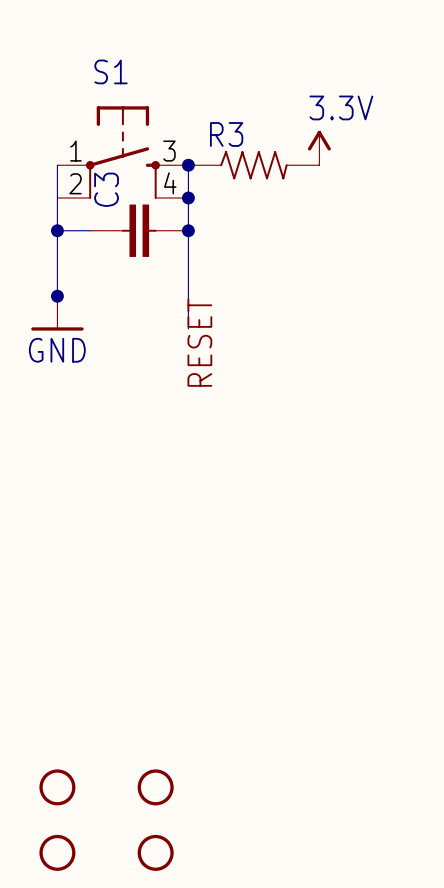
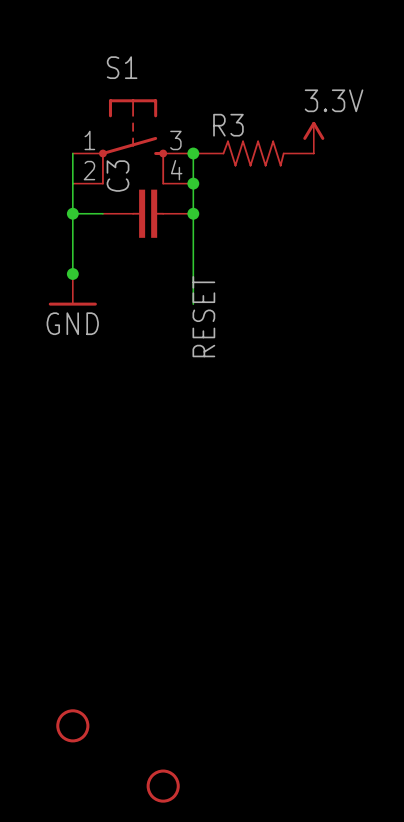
part: (155, 787) -> none
part: (57, 852) -> none

